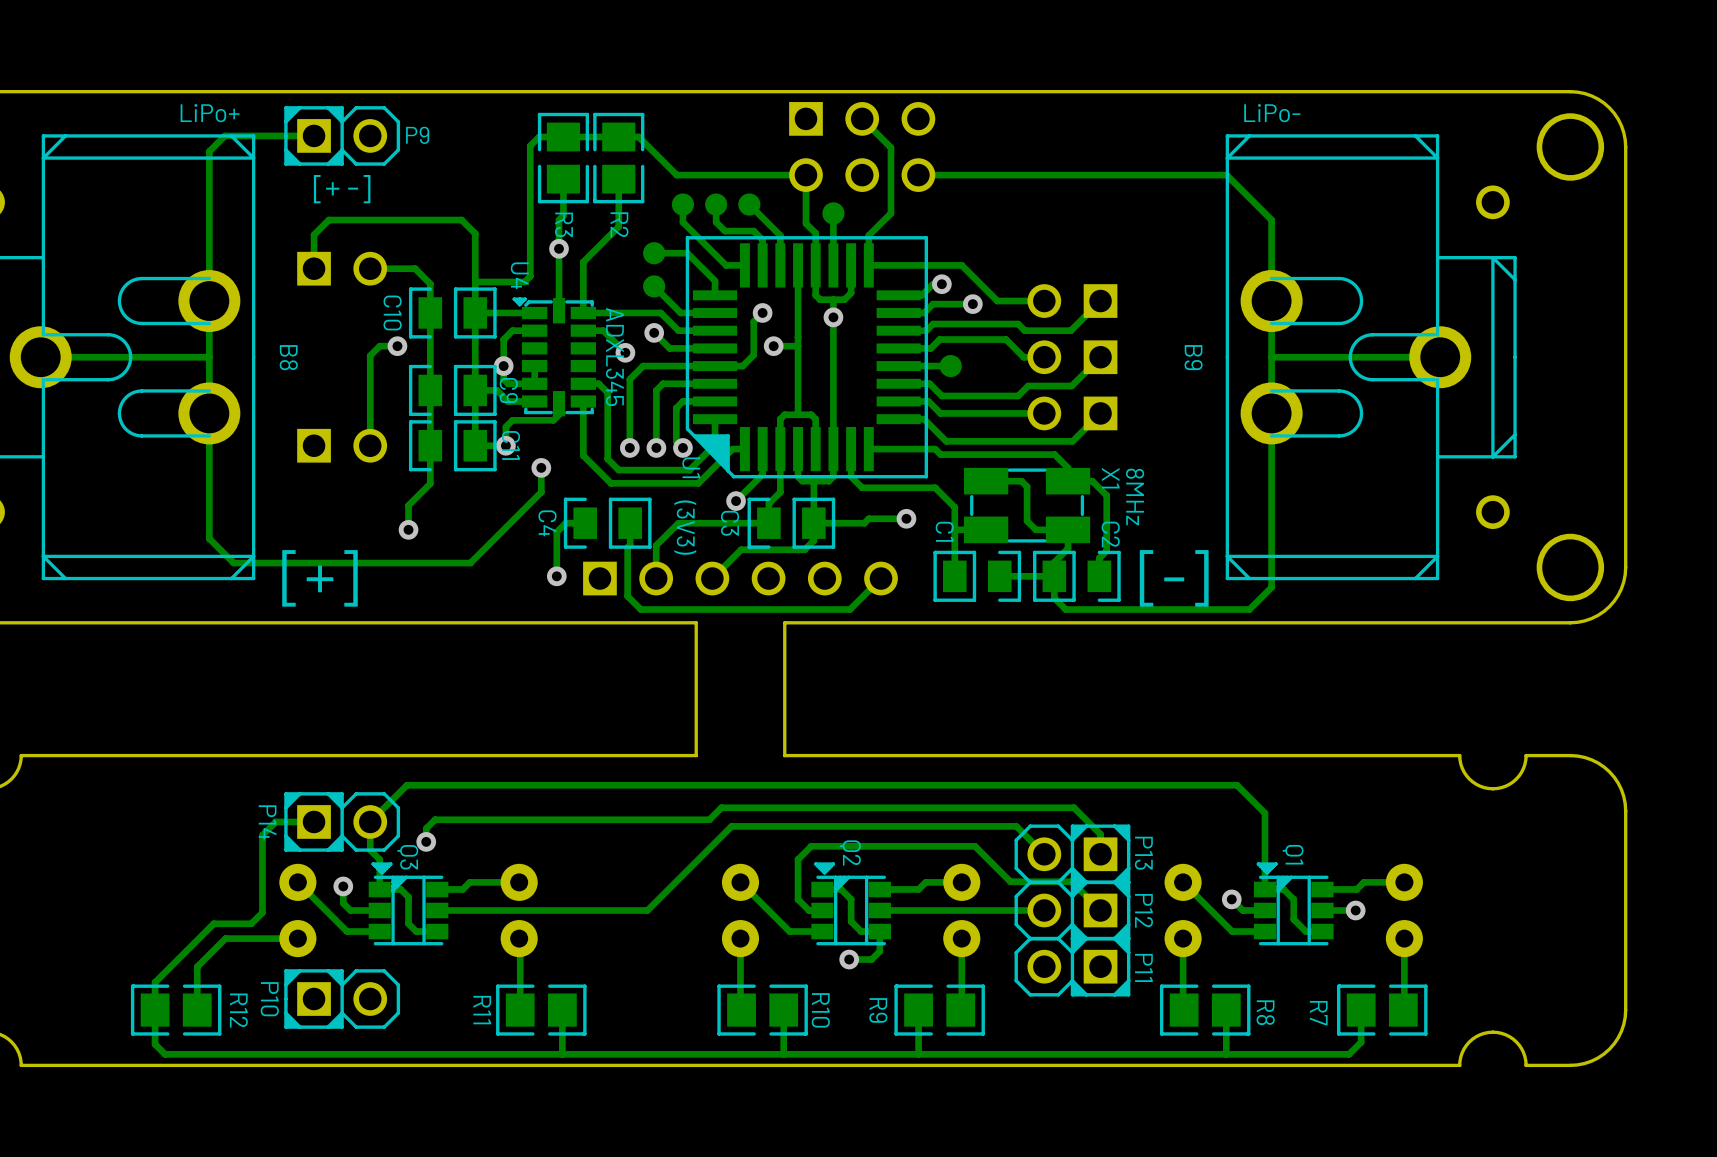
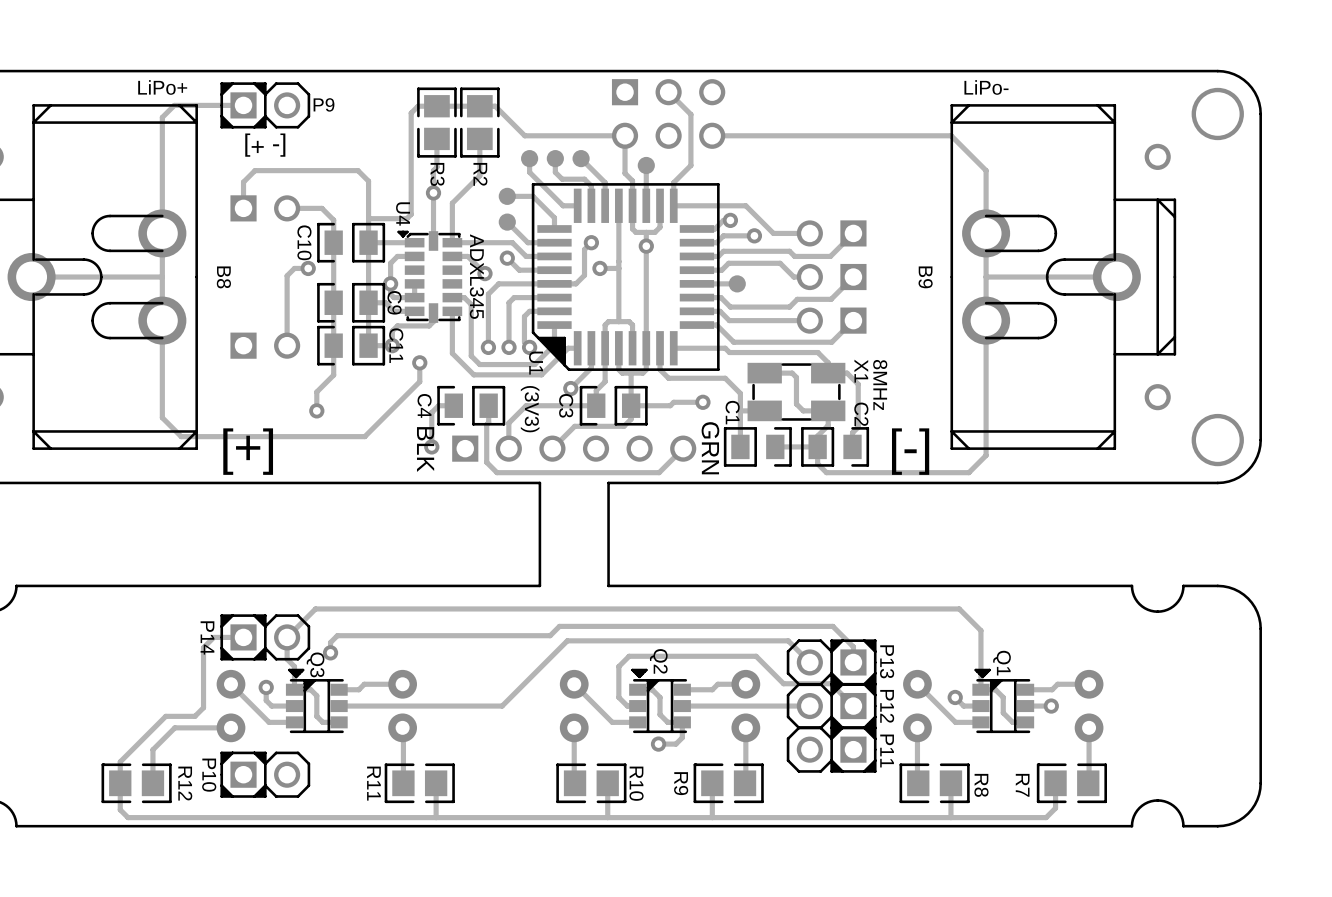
text: none -> GRN (710, 448)
text: none -> BLK (425, 449)

